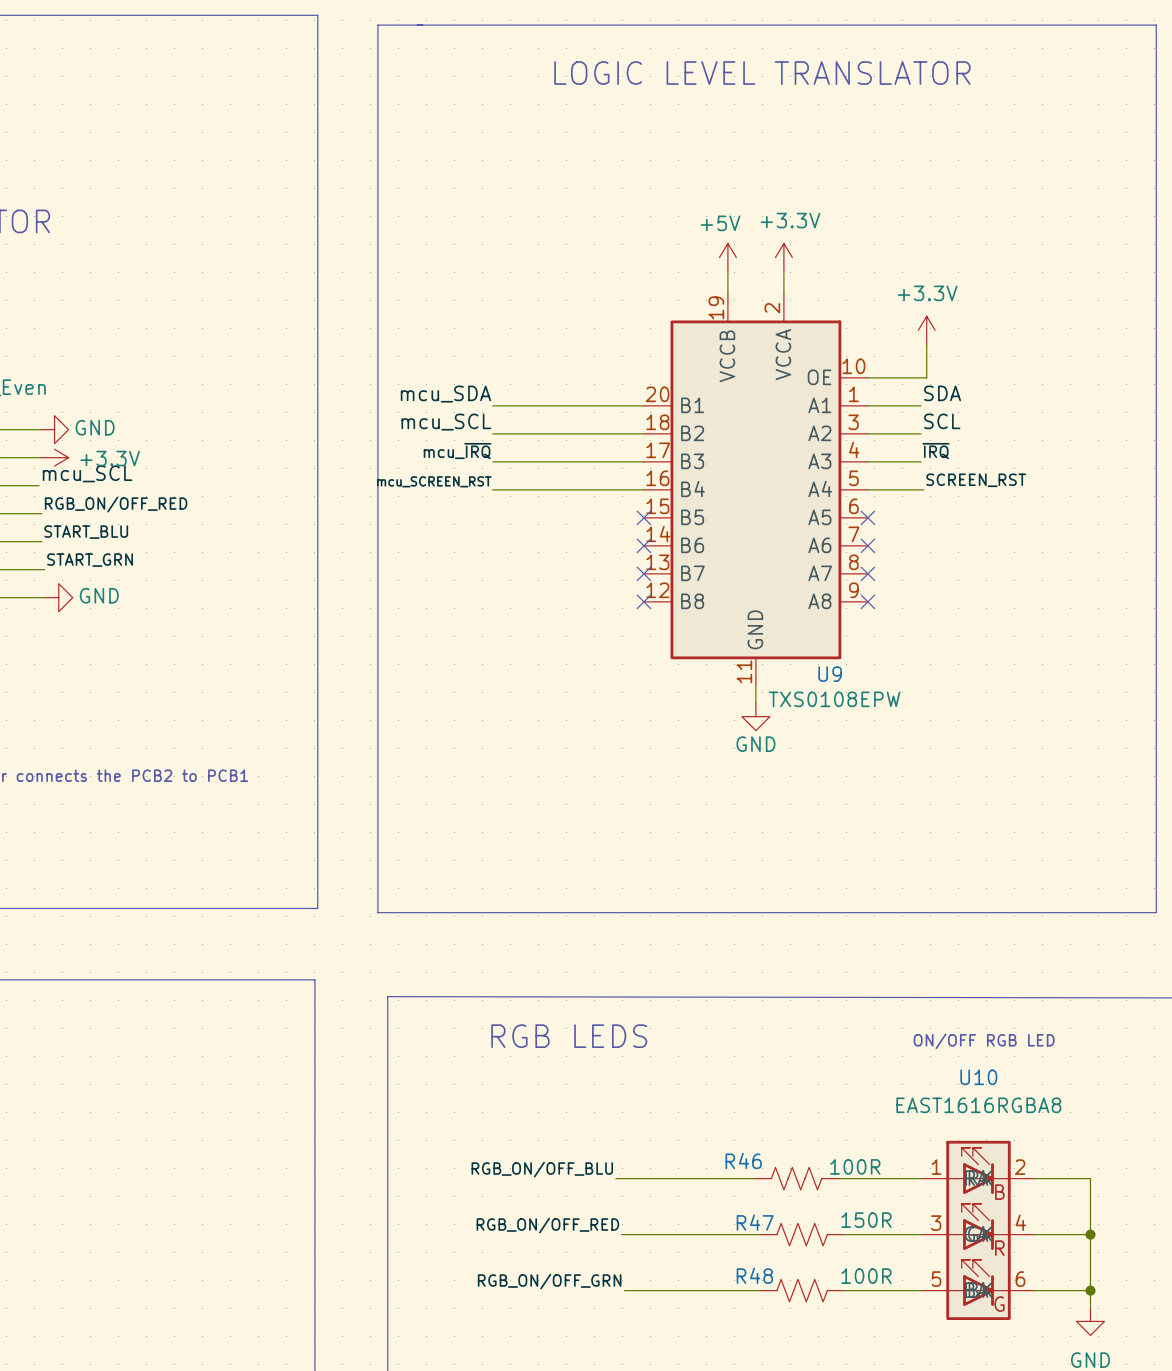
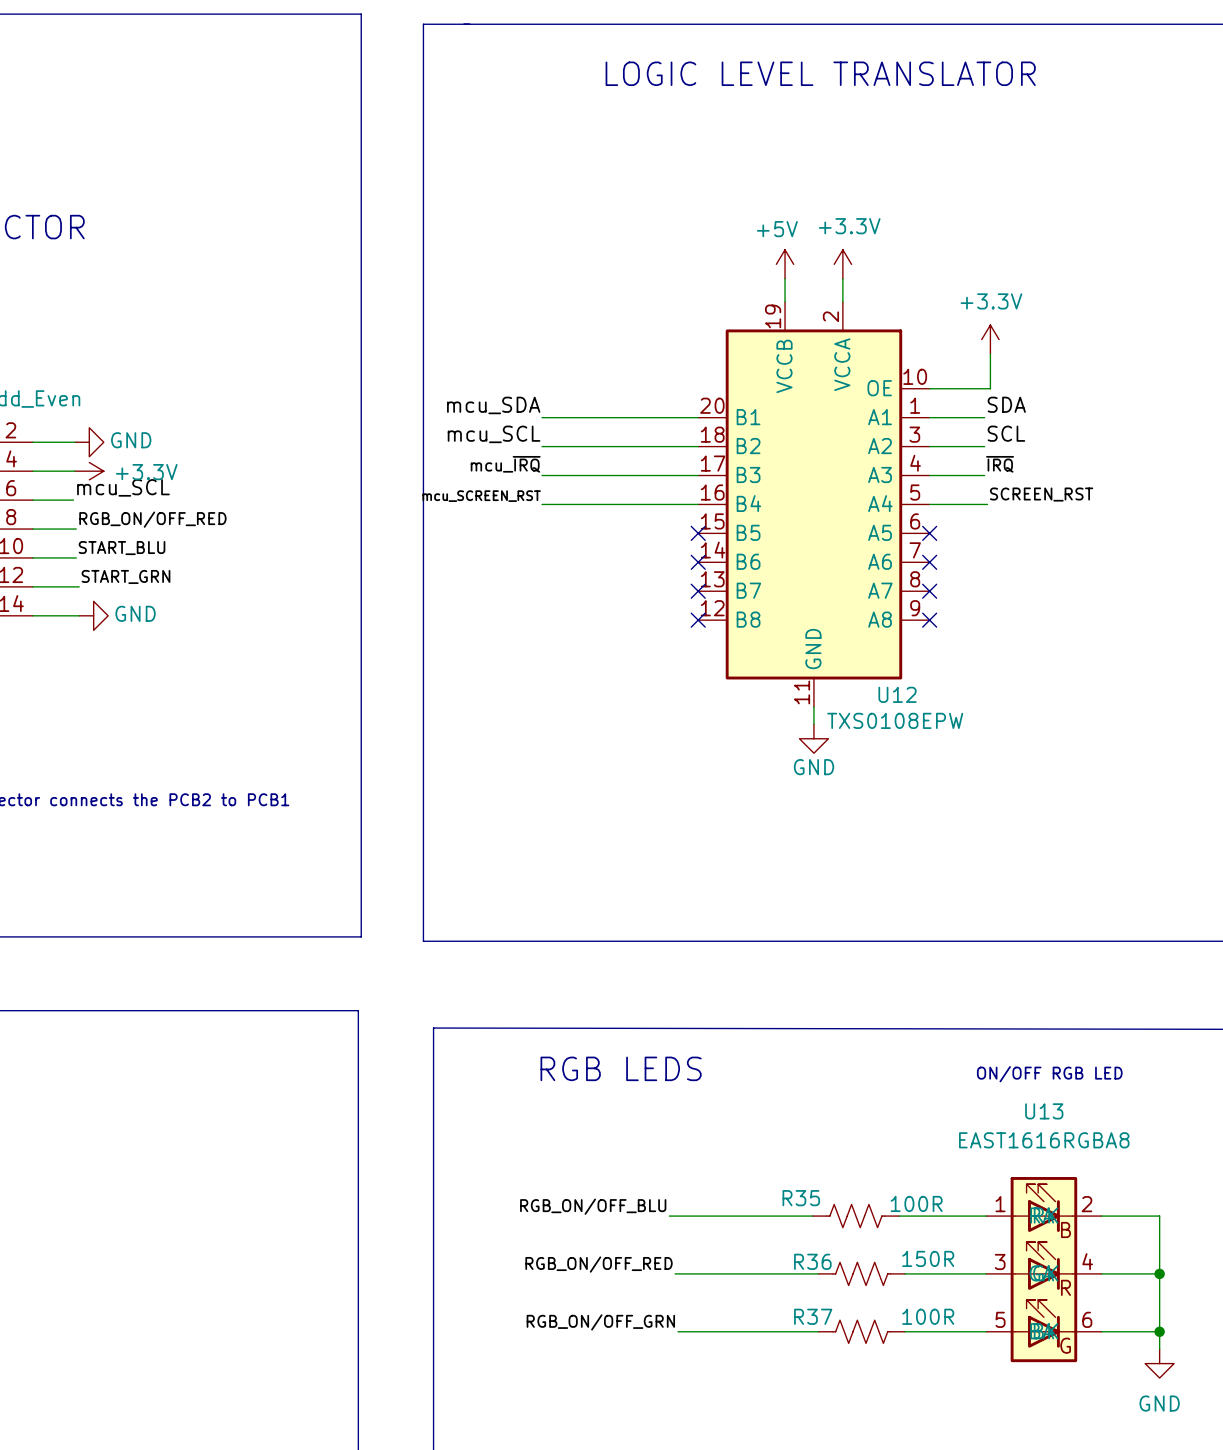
U9 name: U9 (830, 674) -> U12 (897, 694)
U10 name: U10 (978, 1077) -> U13 (1044, 1111)
R46 name: R46 (743, 1160) -> R35 (801, 1198)
R47 name: R47 (755, 1222) -> R36 (812, 1261)
R48 name: R48 (754, 1275) -> R37 (813, 1316)

